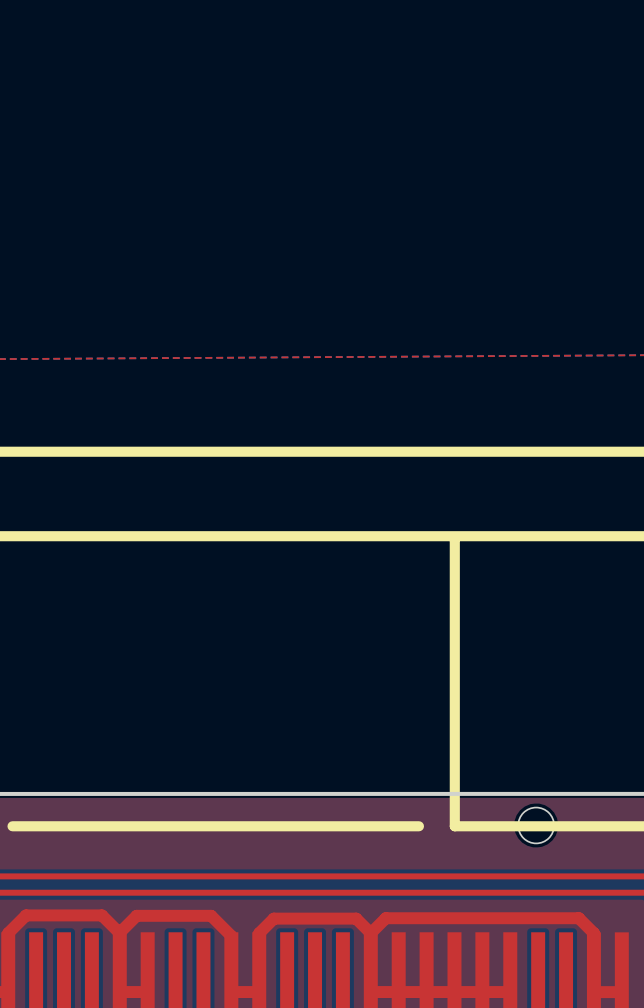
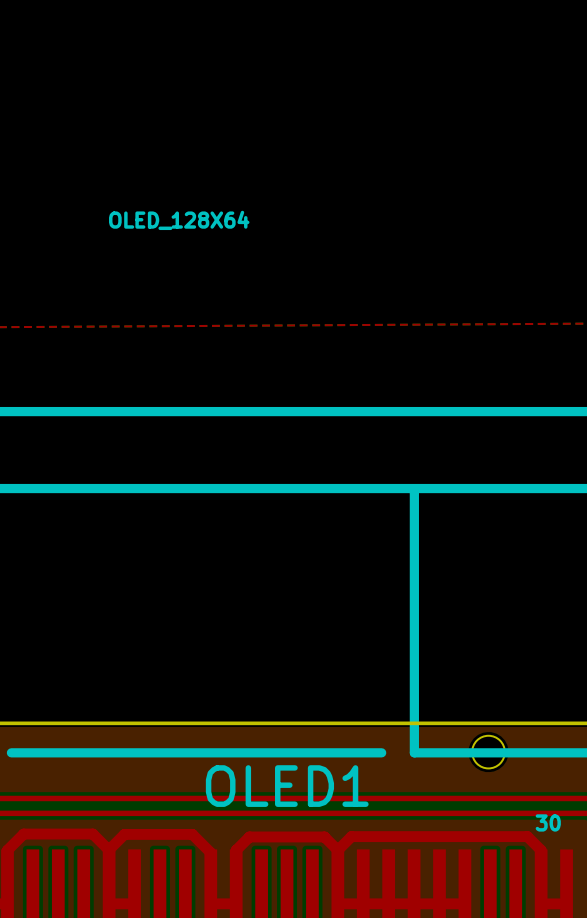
OLED1 text: none -> OLED_128X64 (179, 220)
OLED1 name: none -> OLED1 (287, 786)
OLED1 text: none -> 30 (548, 822)

